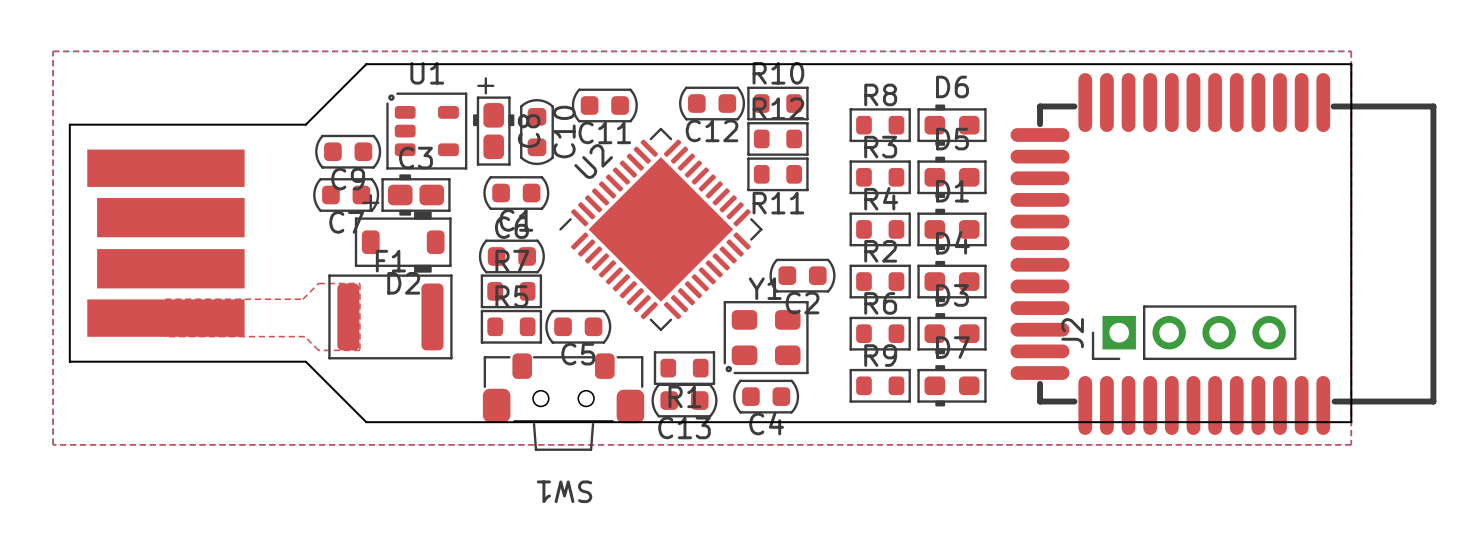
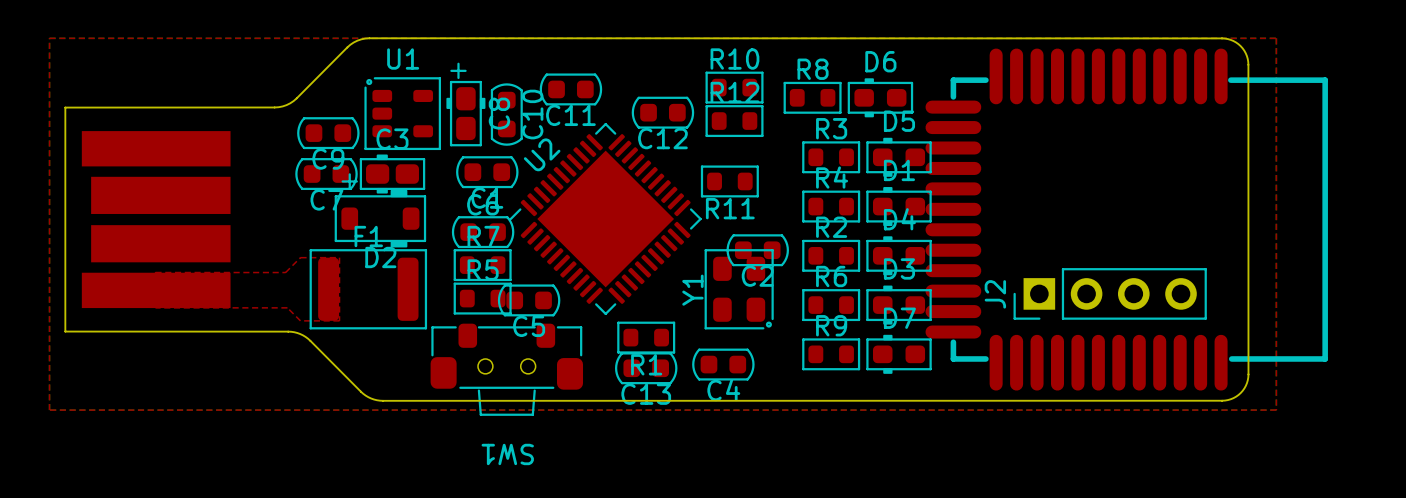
C12 position: (712, 103) -> (662, 112)
board edge: (69, 124) (305, 124) (366, 64) (1351, 64) (1351, 422) (366, 422) (305, 361) (69, 361) -> (65, 107) (282, 106) (296, 98) (350, 44) (361, 39) (369, 38) (1227, 39) (1242, 48) (1248, 61) (1248, 374)
R8 position: (880, 125) -> (812, 97)
D6 position: (952, 125) -> (880, 97)
R11 position: (777, 174) -> (729, 181)
U2 position: (660, 229) -> (605, 218)
part position: (1223, 254) -> (1126, 219)
C5 position: (578, 326) -> (529, 300)
J2 position: (1194, 332) -> (1110, 293)
Y1 rotation: 0° (766, 337) -> 90° counterclockwise (739, 289)
board edge: none -> (65, 331) (294, 332) (308, 338) (363, 393) (371, 398) (383, 400) (1222, 400) (1233, 398) (1240, 392) (1245, 385) (1248, 374)
SW1 position: (563, 402) -> (506, 369)

